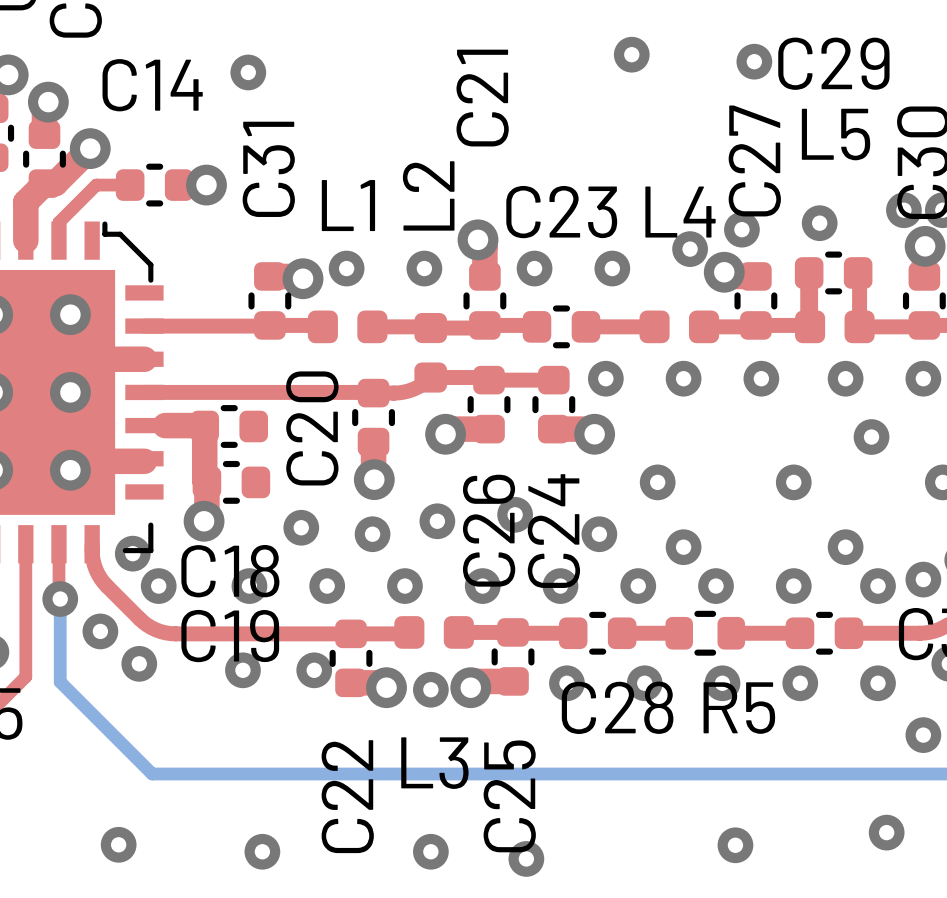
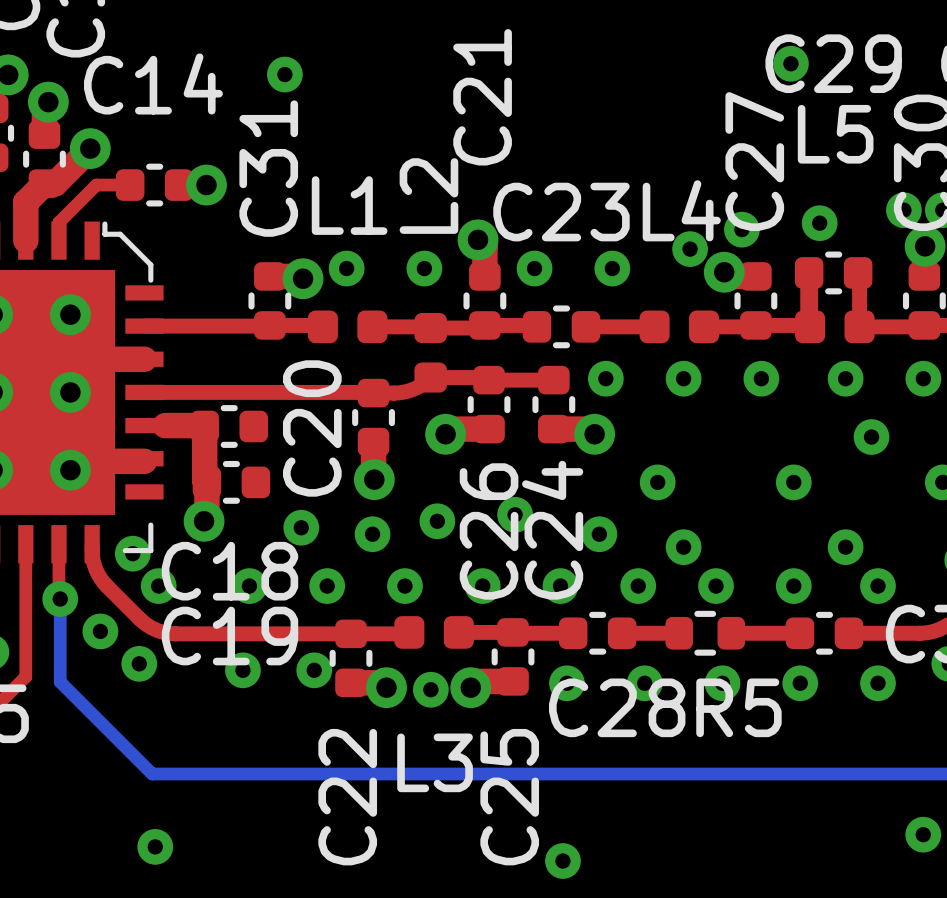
via: (631, 54) -> none
via position: (754, 61) -> (790, 63)
via position: (248, 72) -> (284, 74)
via: (923, 579) -> none
via: (923, 735) -> none
via position: (886, 832) -> (923, 834)
via position: (118, 844) -> (155, 846)
via: (735, 845) -> none
via: (262, 851) -> none
via: (430, 851) -> none
via position: (526, 858) -> (562, 861)

